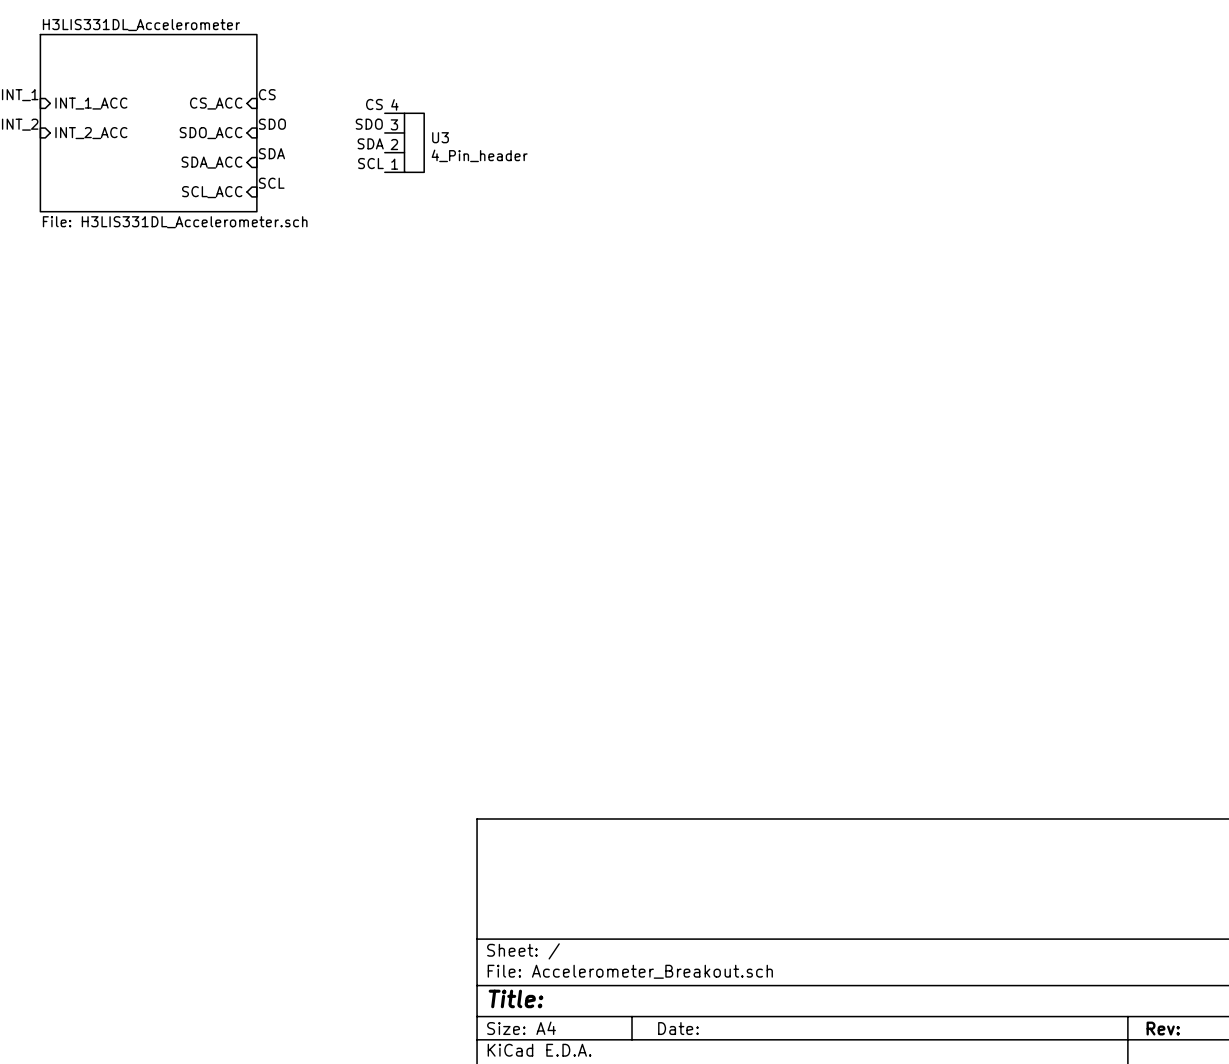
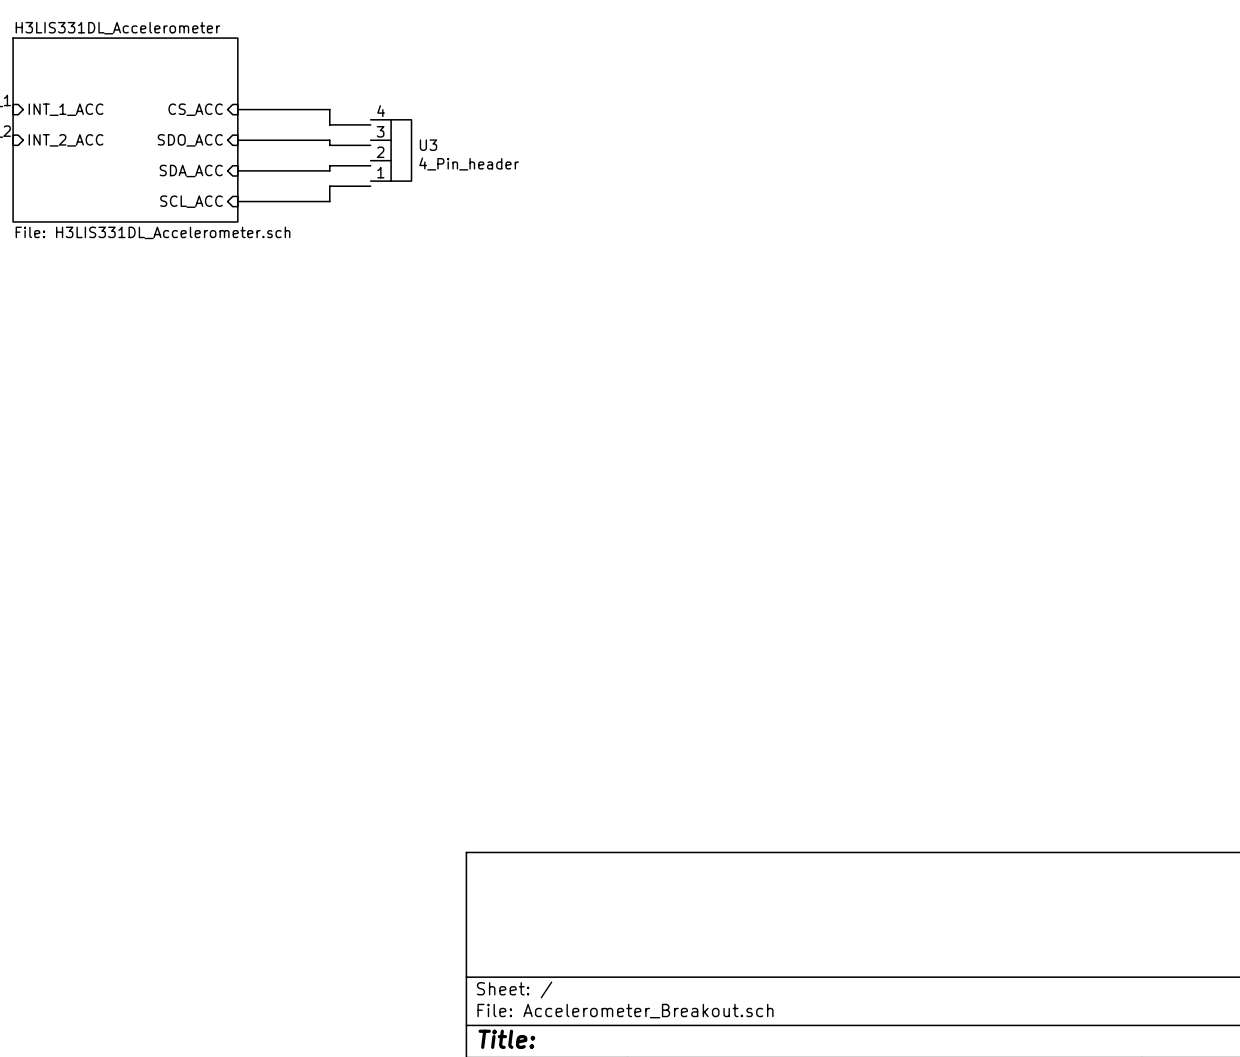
label: CS (267, 94) -> none
wire: none -> (237, 109) (329, 109) (329, 124) (370, 124)
label: CS (374, 104) -> none
label: SDO (272, 124) -> none
label: SDO (369, 124) -> none
wire: none -> (237, 140) (329, 140) (329, 145) (370, 145)
label: SDA (370, 143) -> none
label: SDA (271, 153) -> none
wire: none -> (370, 165) (329, 165) (329, 170) (237, 170)
label: SCL (370, 163) -> none
wire: none -> (370, 186) (329, 186) (329, 201) (237, 201)
label: SCL (271, 183) -> none

